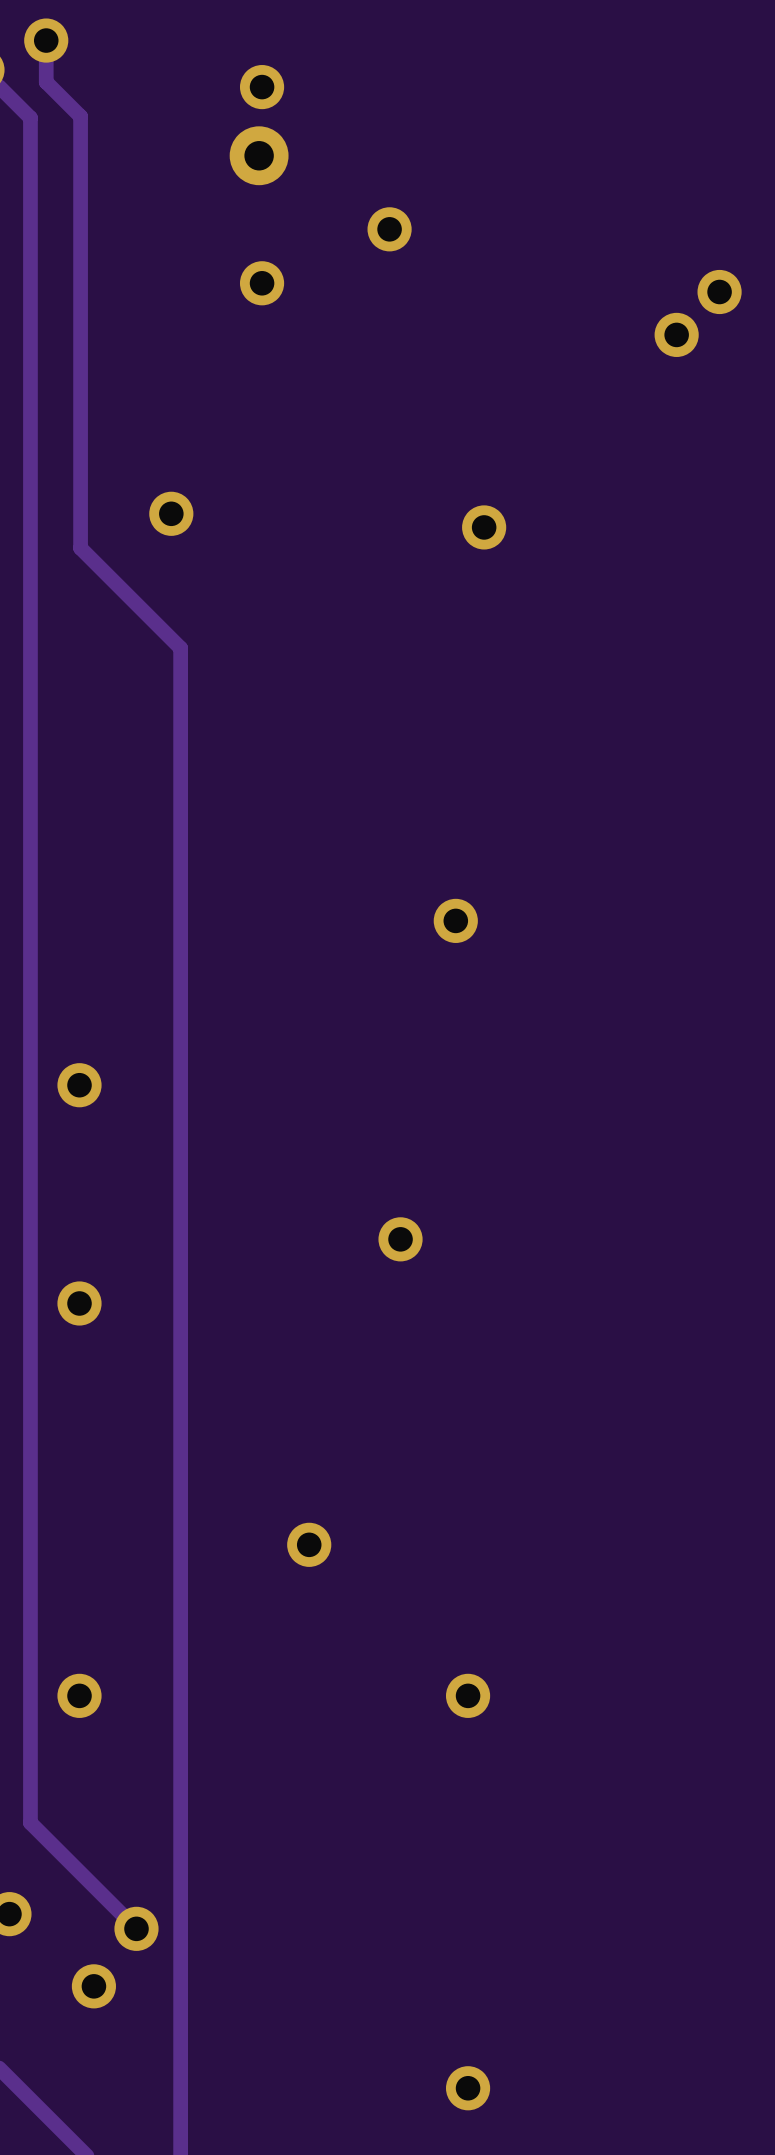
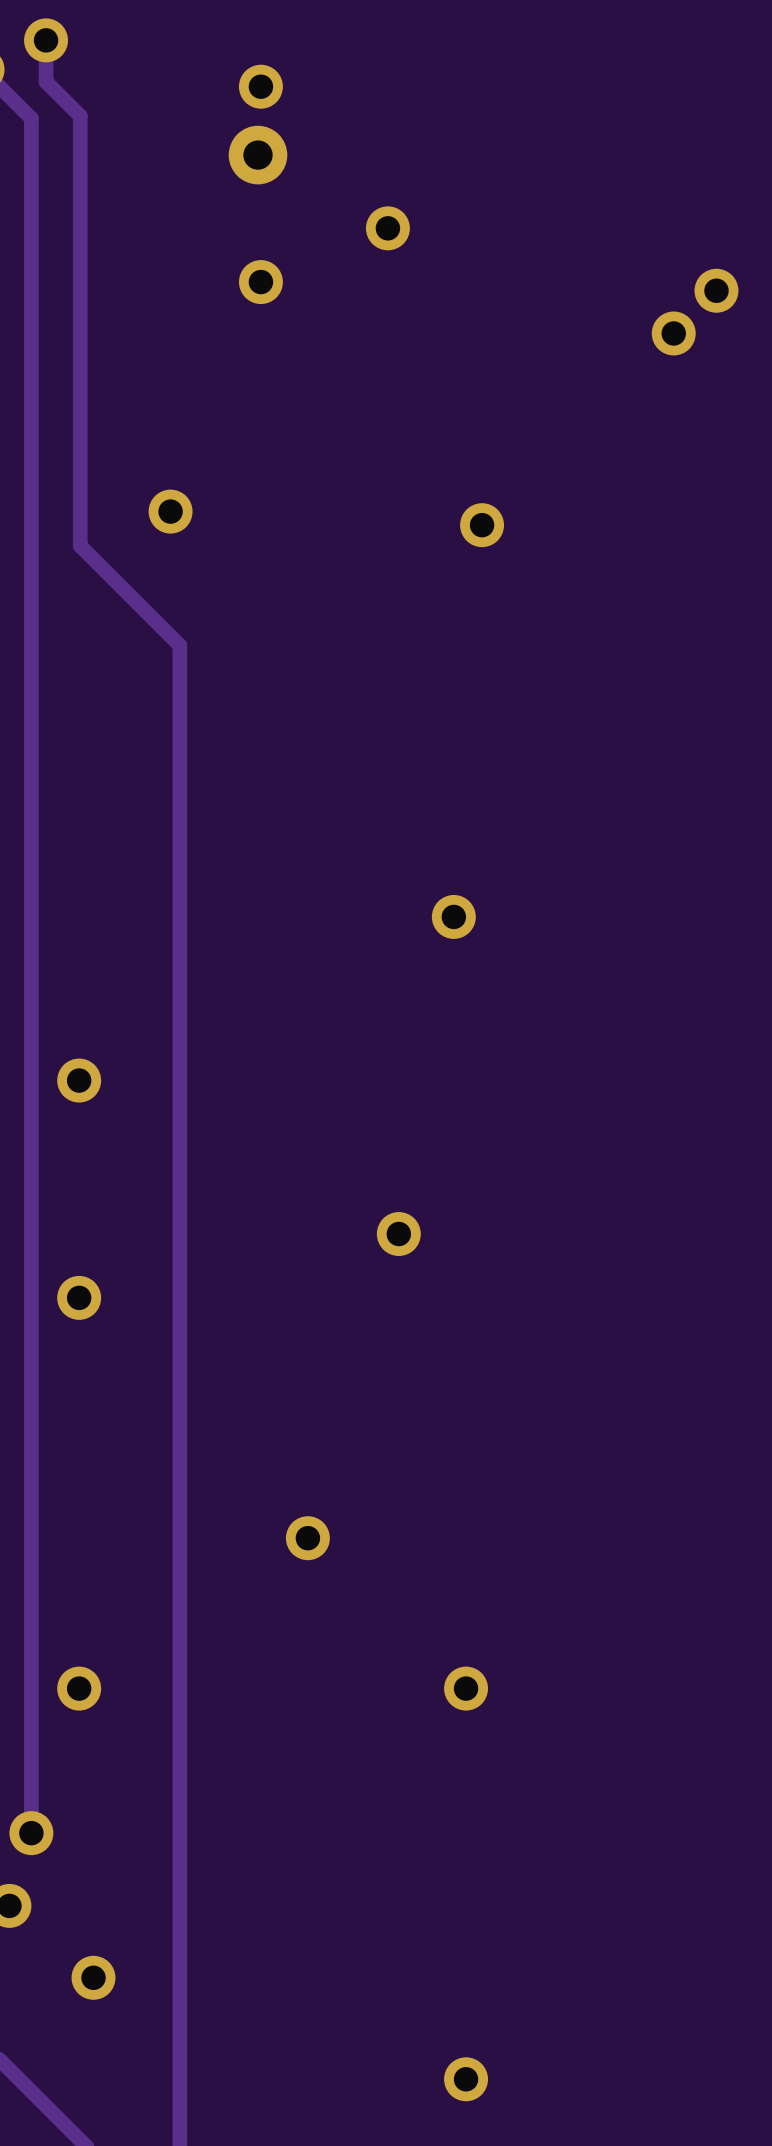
track: (30, 117) (30, 1822) (136, 1928) (149, 1928) -> (31, 118) (31, 1833)
via position: (136, 1928) -> (31, 1833)

